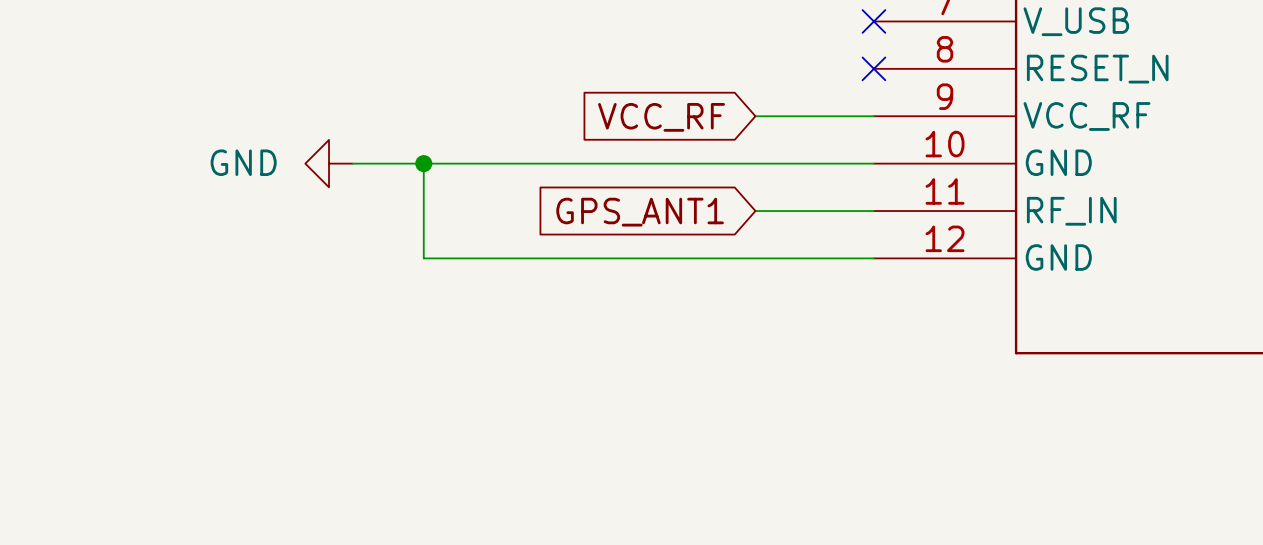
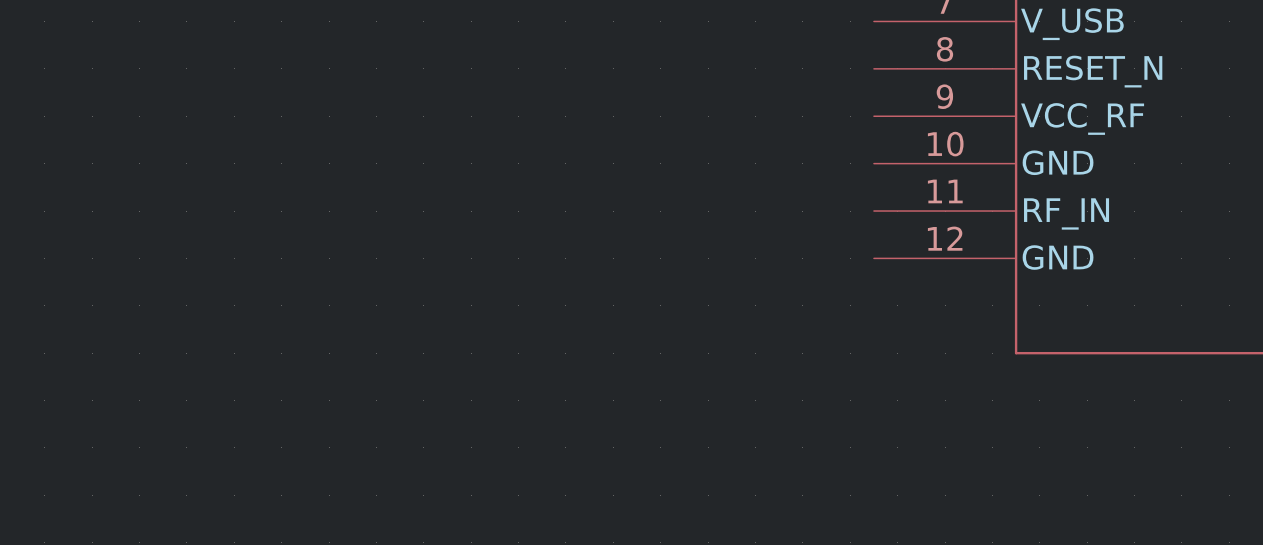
no-connect mark: (873, 21) -> none
no-connect mark: (873, 68) -> none
wire: (755, 116) (873, 116) -> none
global label: VCC_RF (661, 117) -> none
power symbol: GND (329, 163) -> none
wire: (352, 163) (873, 163) -> none
wire: (423, 163) (423, 258) (873, 258) -> none
junction: (423, 163) -> none
wire: (755, 211) (873, 211) -> none
global label: GPS_ANT1 (640, 212) -> none

